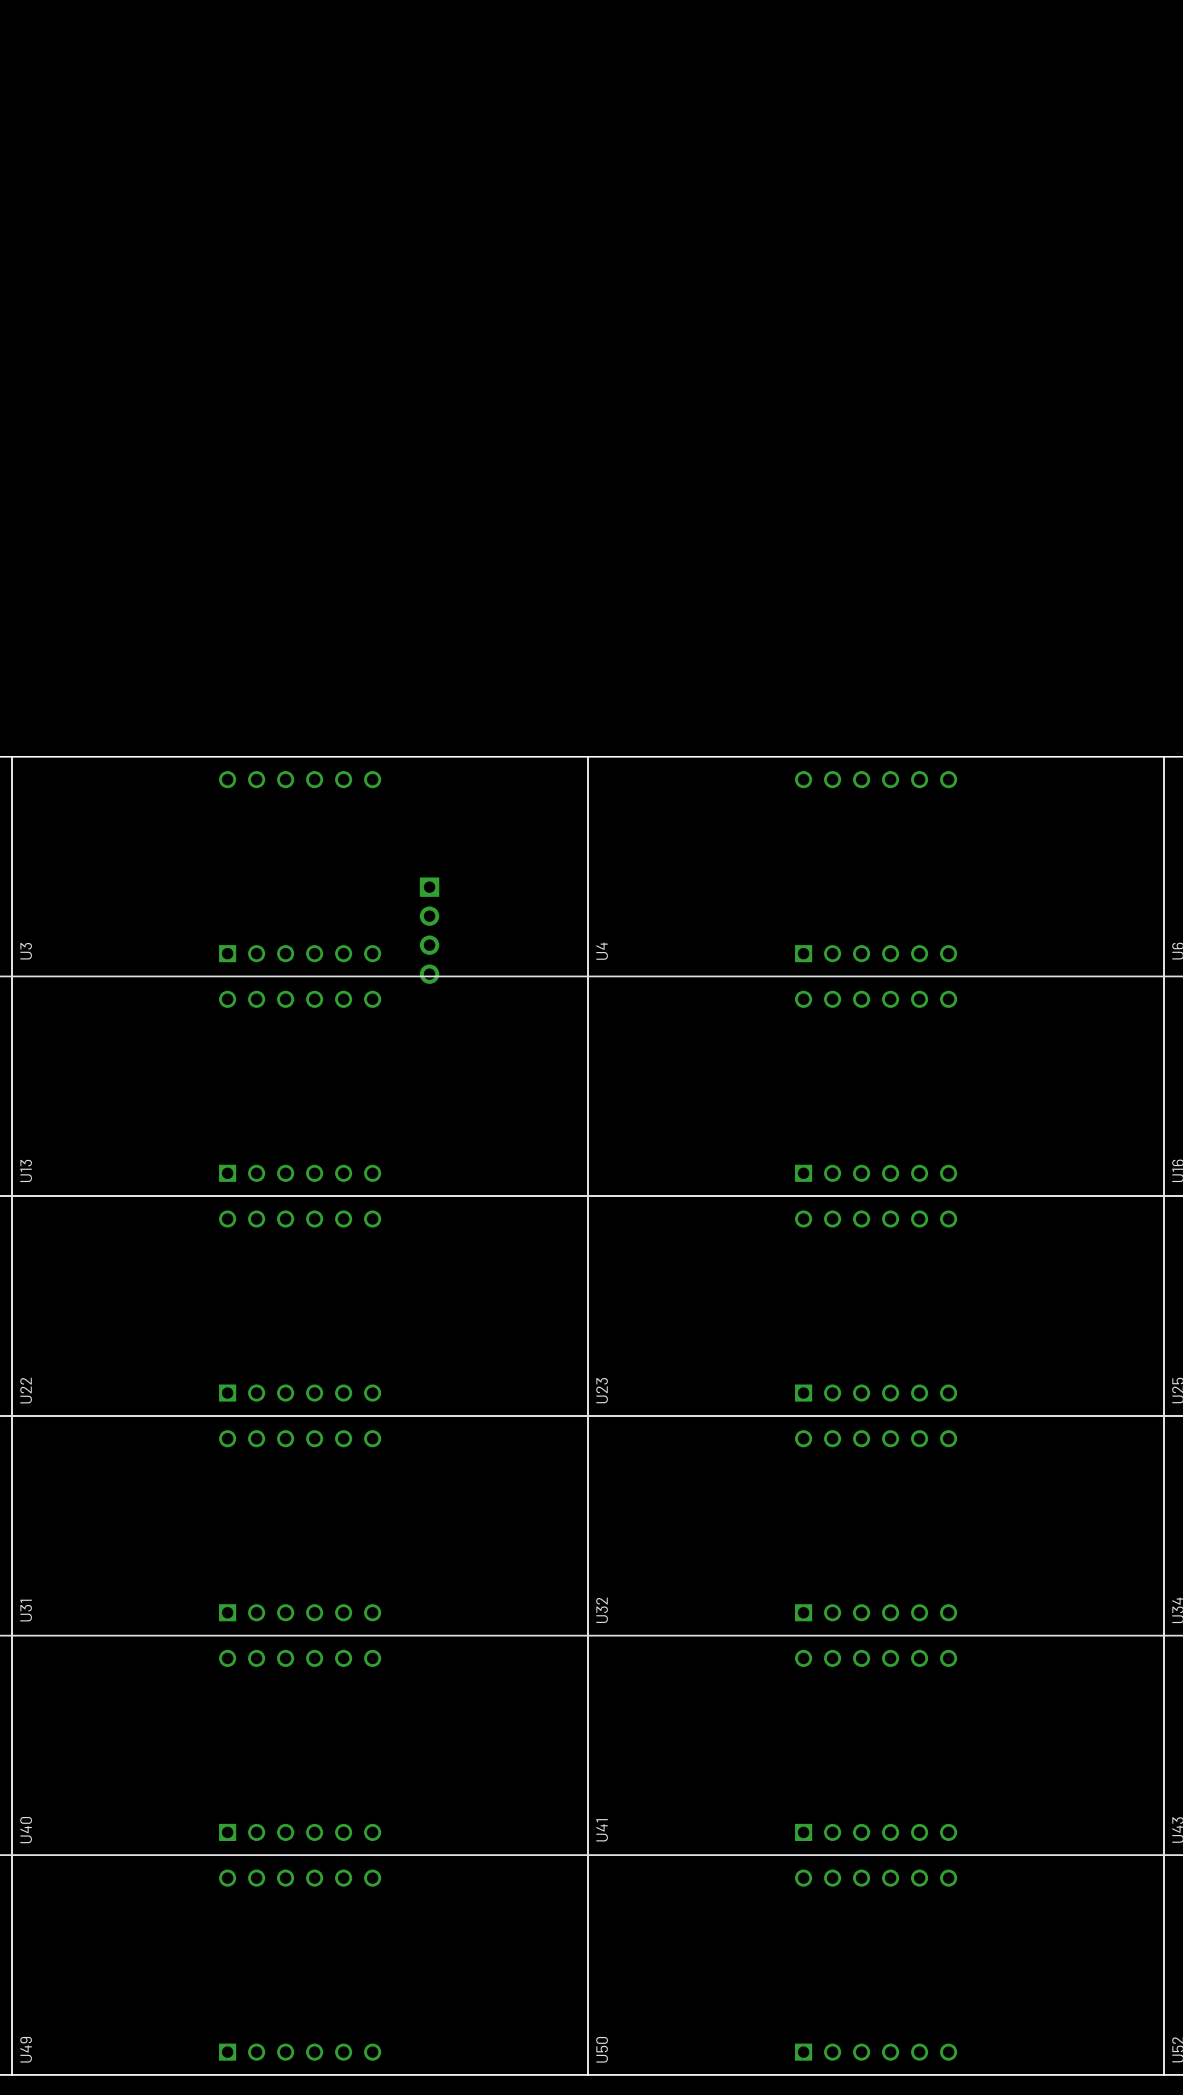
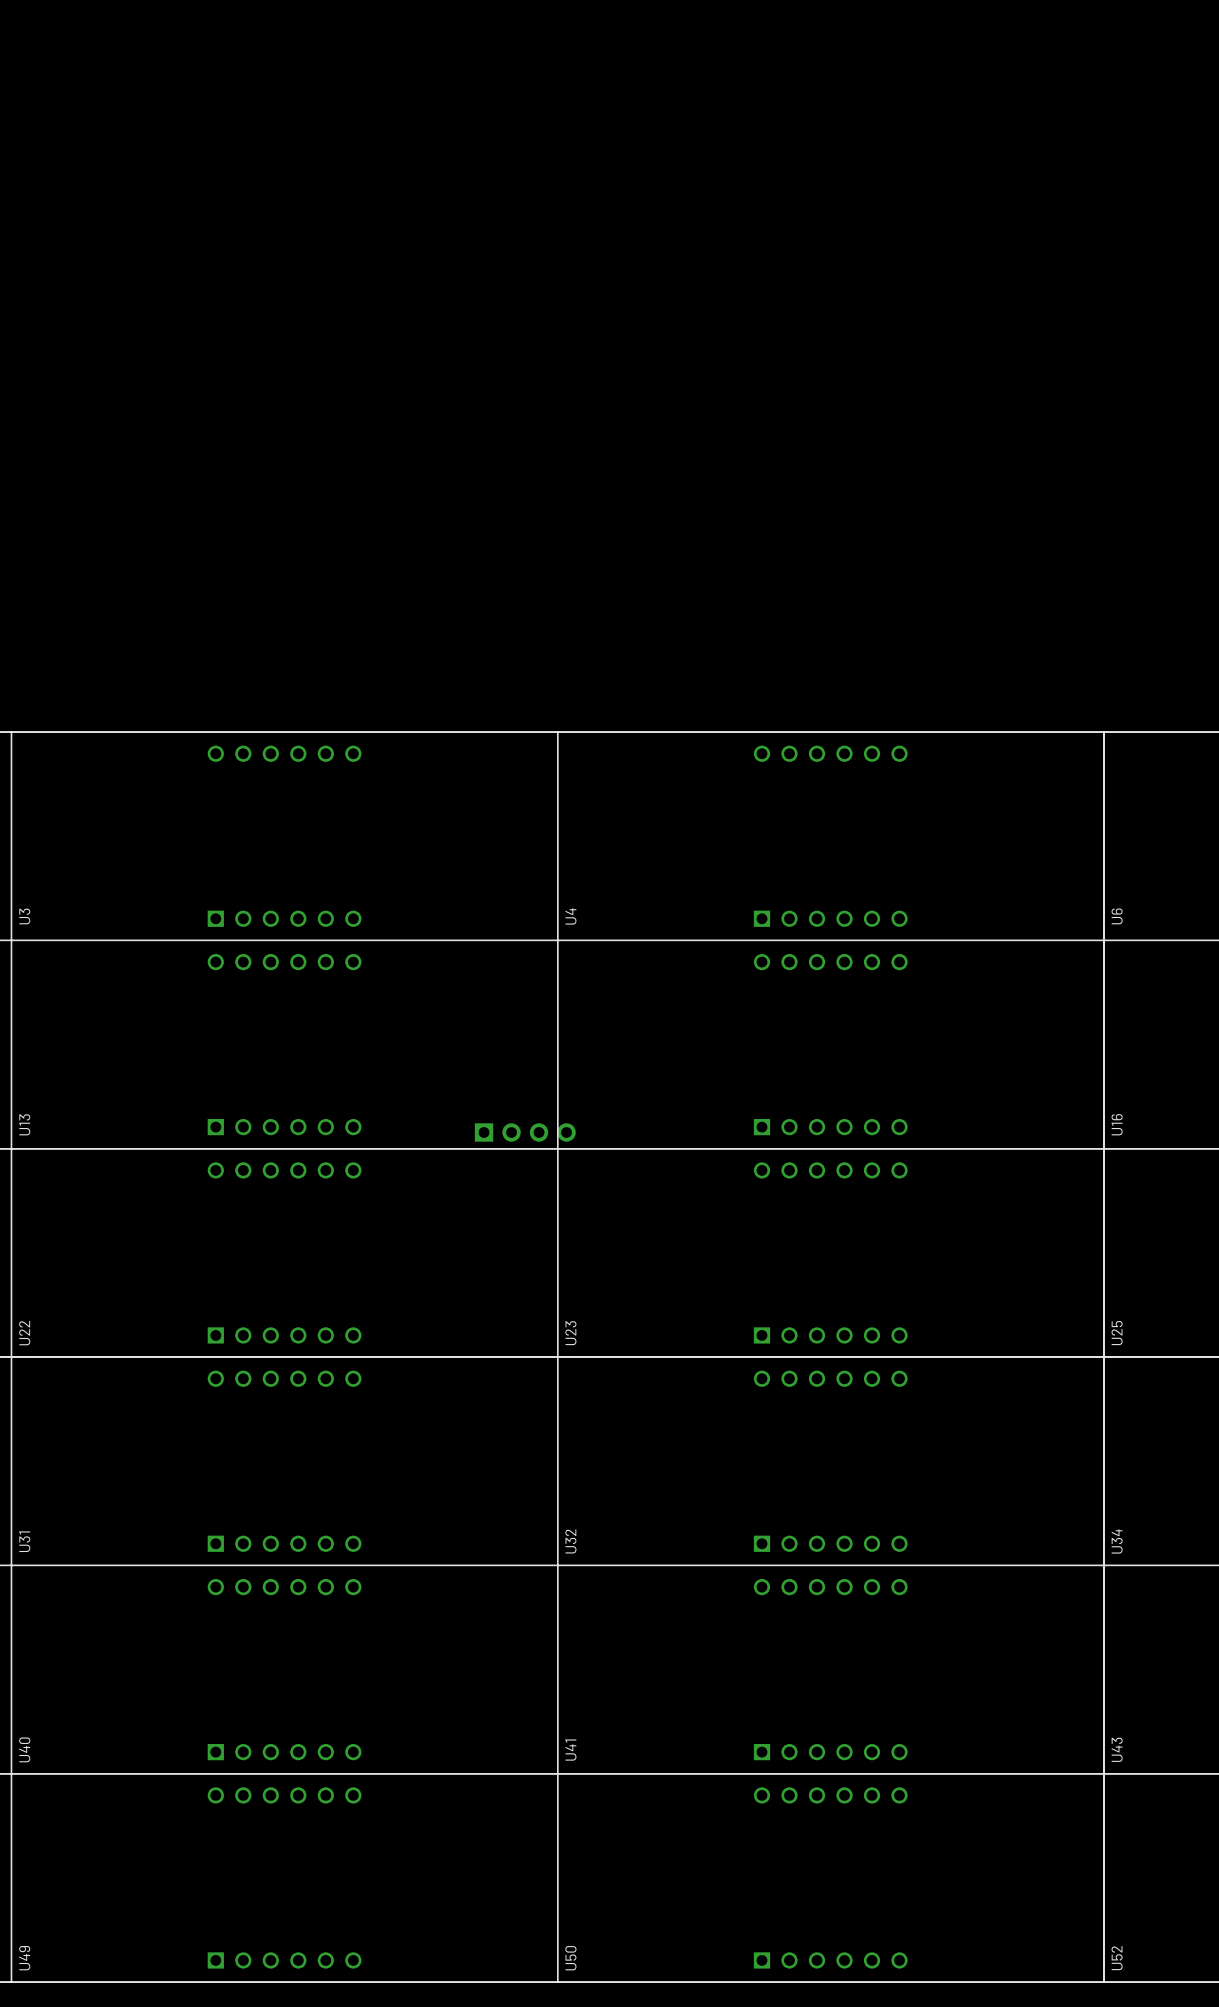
part rotation: 0° (429, 930) -> 90° counterclockwise (525, 1132)
part position: (429, 930) -> (525, 1132)

